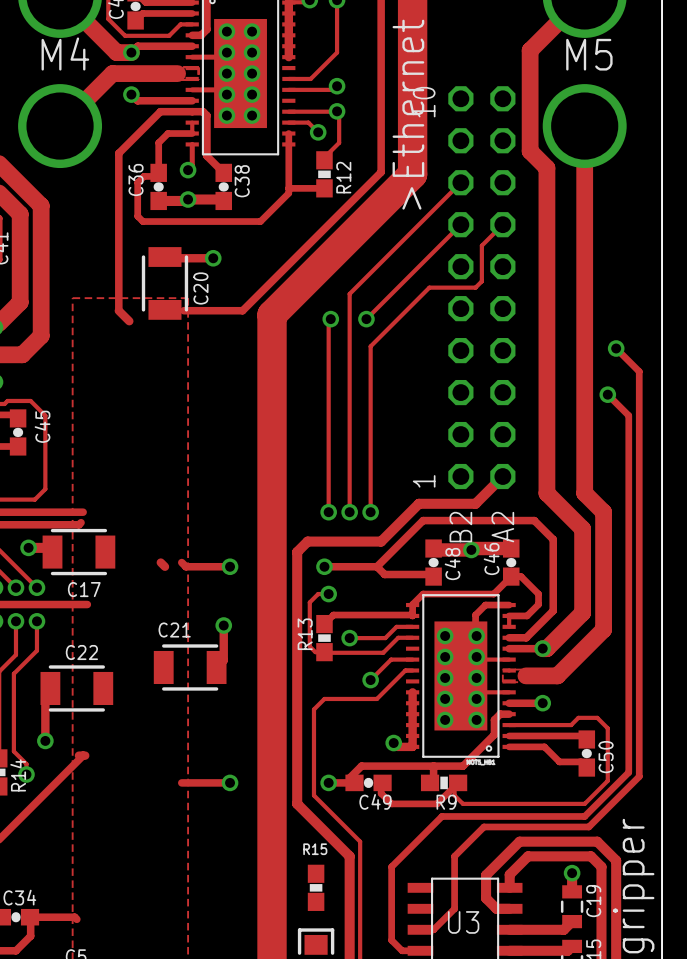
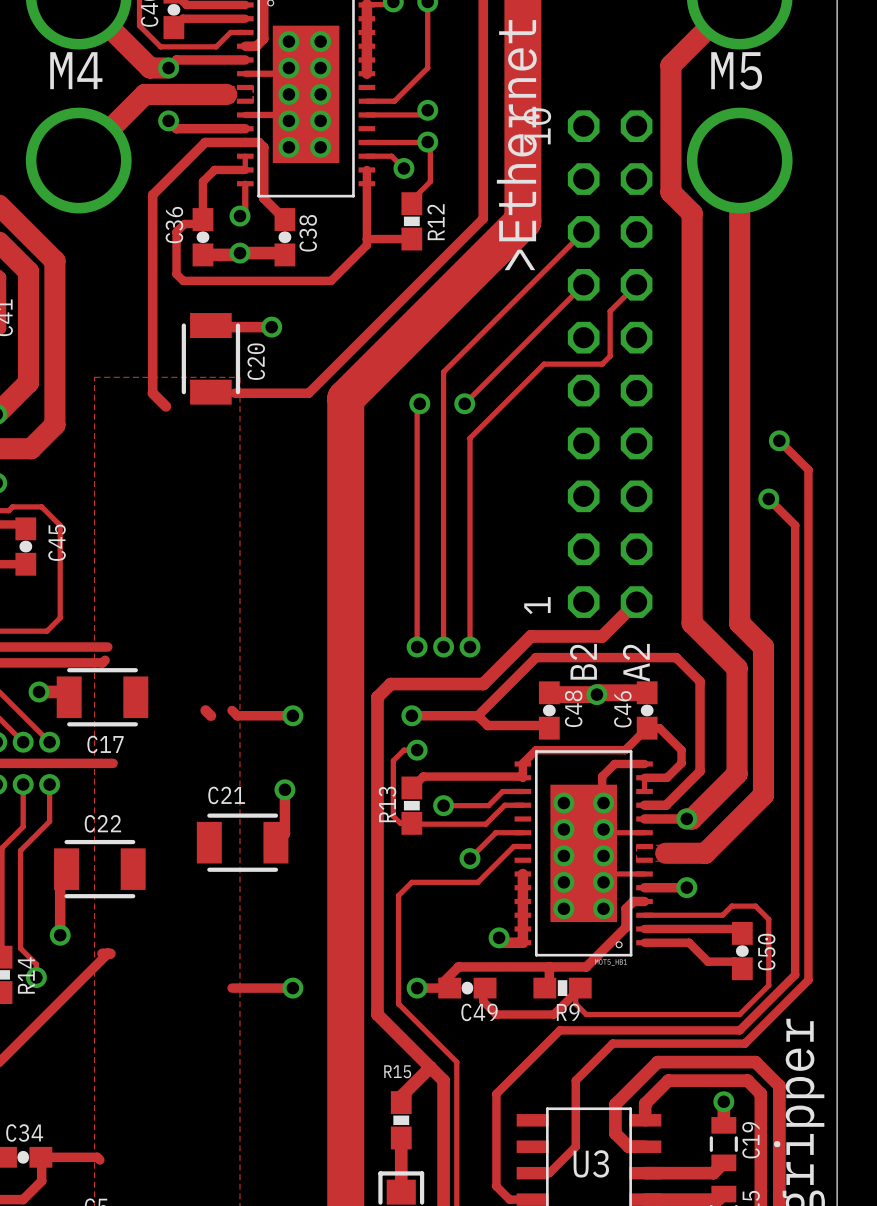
track: none -> (430, 1067) (401, 1096) (401, 1102)
track: none -> (401, 1137) (401, 1192)

